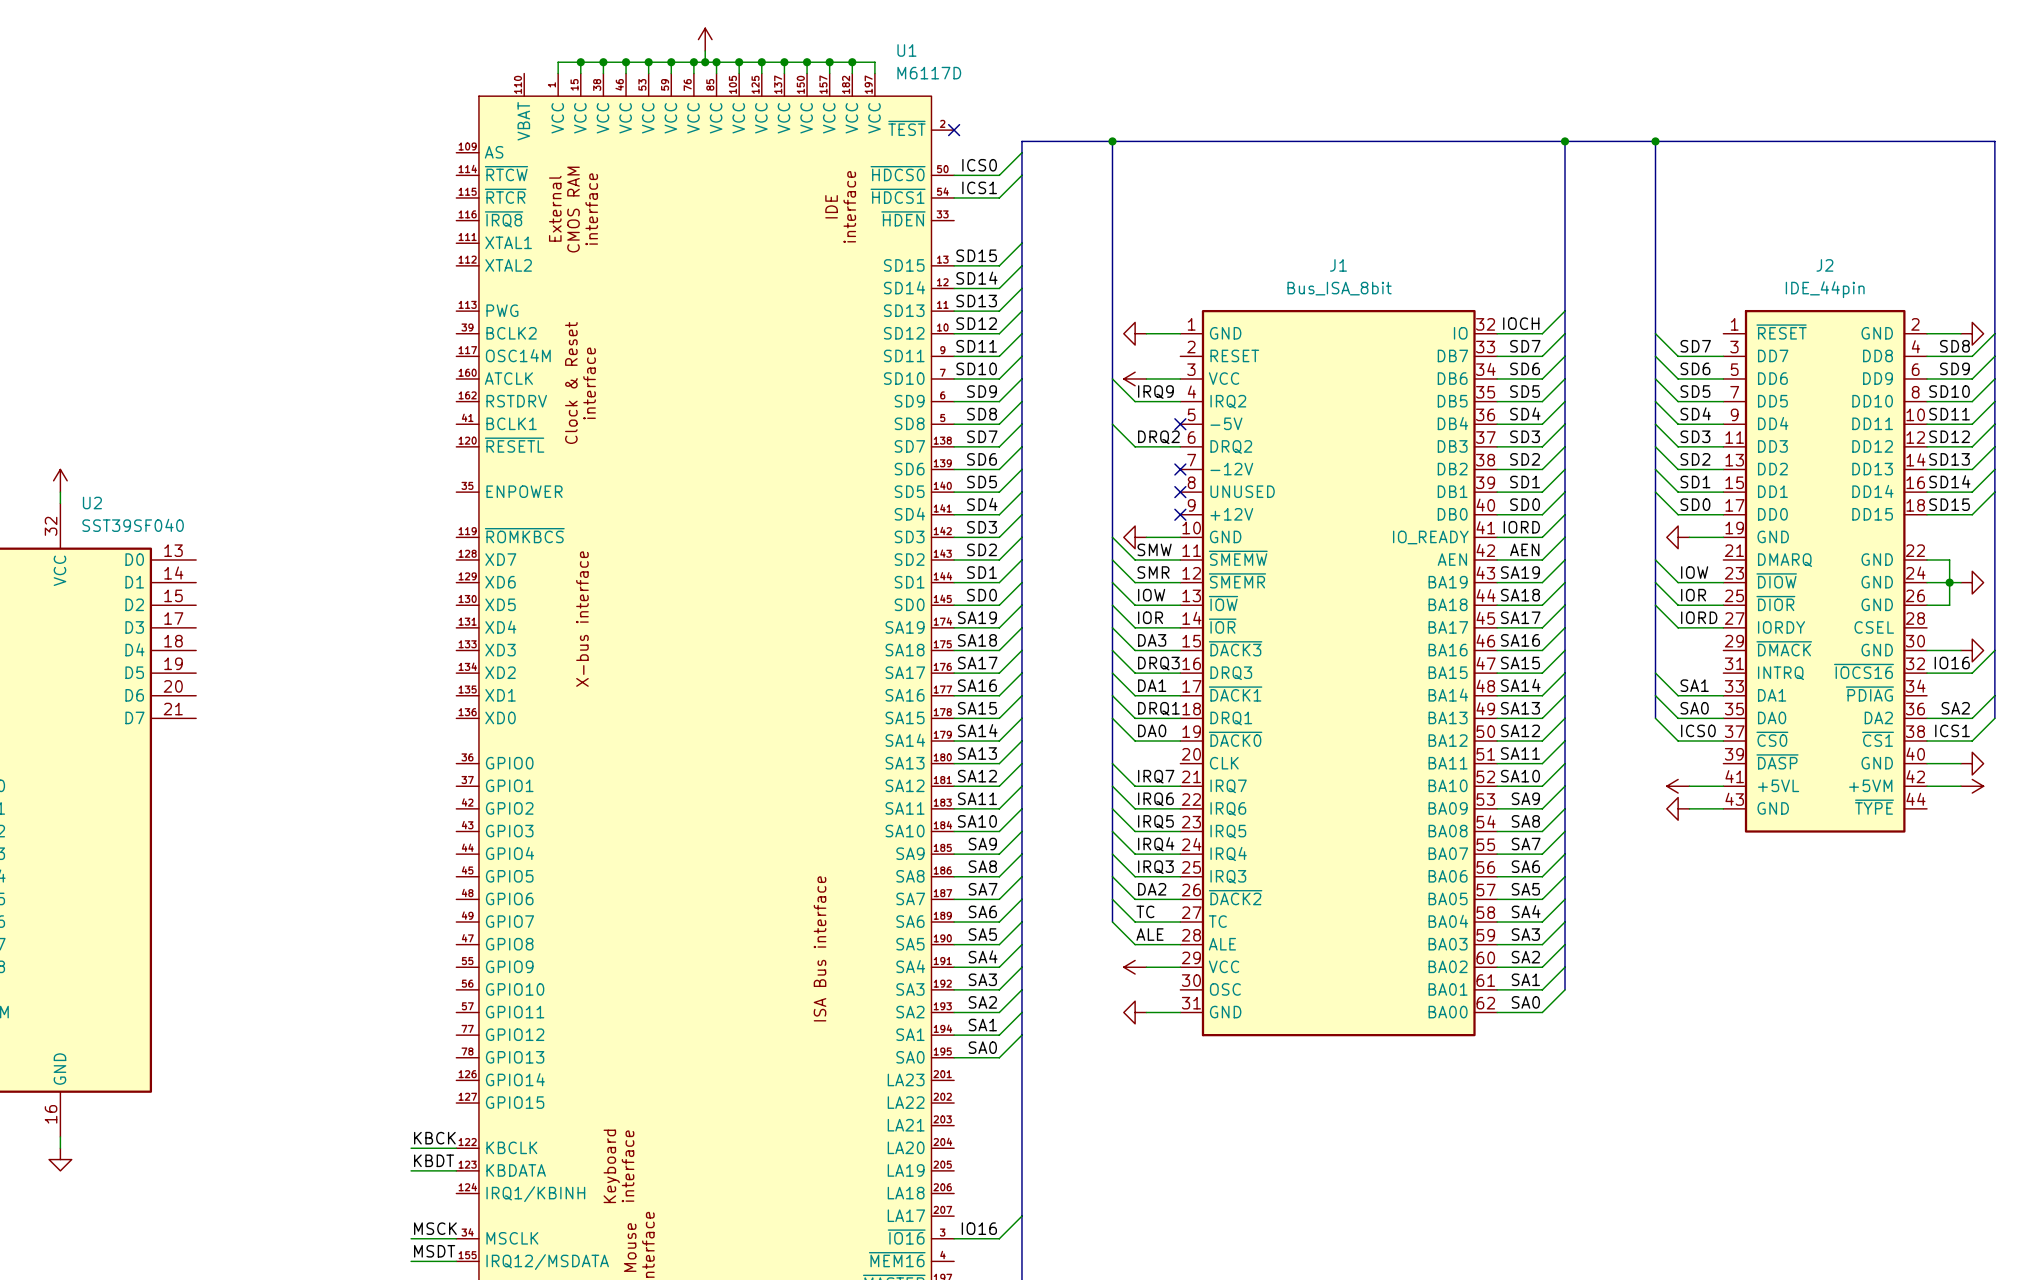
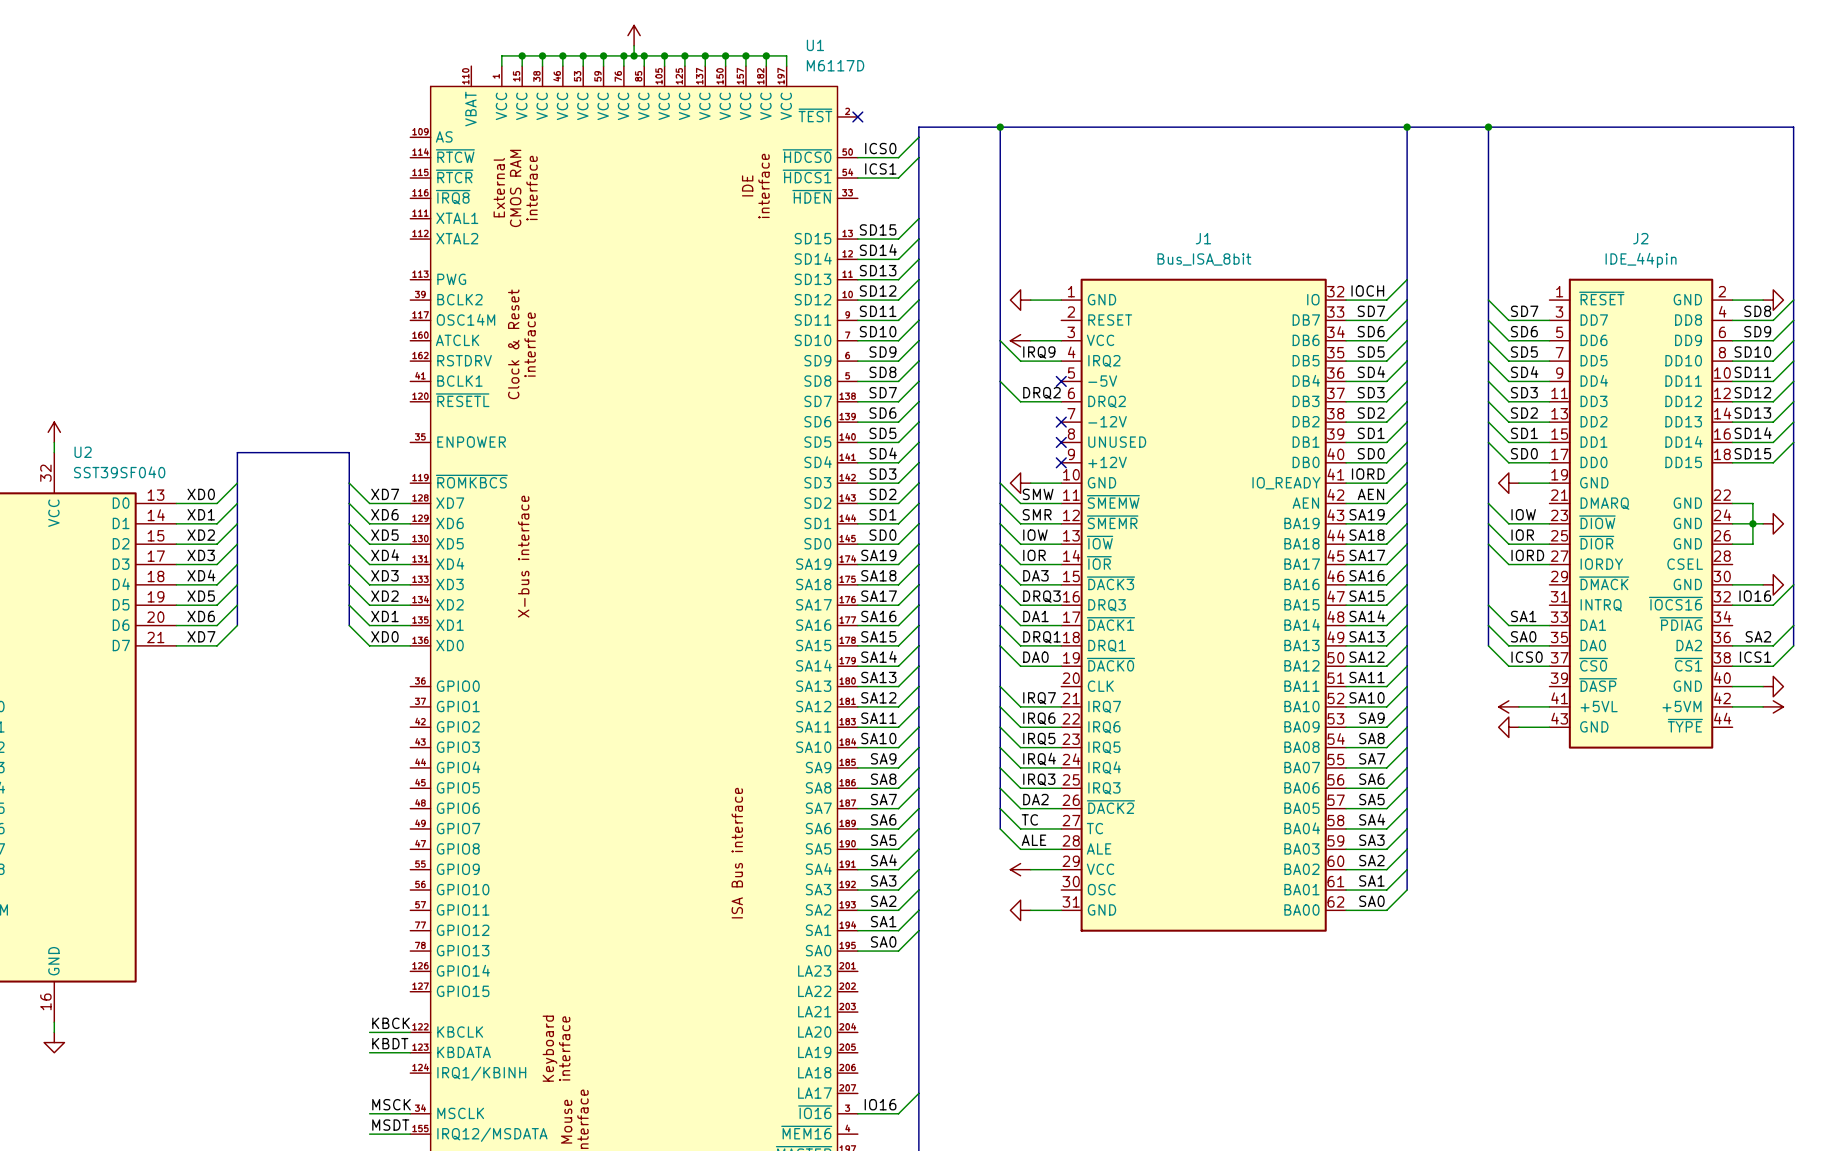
wire: none -> (237, 483) (217, 503) (176, 503)
wire: none -> (349, 483) (369, 503) (410, 503)
label: none -> XD0 (201, 494)
label: none -> XD7 (385, 494)
wire: none -> (237, 503) (217, 523) (176, 523)
wire: none -> (349, 503) (369, 523) (410, 523)
label: none -> XD1 (201, 514)
label: none -> XD6 (384, 514)
wire: none -> (237, 523) (217, 544) (176, 544)
wire: none -> (349, 523) (369, 544) (410, 544)
label: none -> XD2 (201, 535)
label: none -> XD5 (384, 535)
wire: none -> (237, 544) (217, 564) (176, 564)
wire: none -> (349, 544) (369, 564) (410, 564)
label: none -> XD3 (201, 555)
label: none -> XD4 (385, 555)
wire: none -> (237, 564) (217, 584) (176, 584)
wire: none -> (349, 564) (369, 584) (410, 584)
label: none -> XD4 (201, 575)
label: none -> XD3 (384, 575)
wire: none -> (237, 584) (217, 605) (176, 605)
wire: none -> (349, 584) (369, 605) (410, 605)
label: none -> XD5 (201, 596)
label: none -> XD2 (384, 596)
wire: none -> (237, 605) (217, 625) (176, 625)
wire: none -> (349, 605) (369, 625) (410, 625)
label: none -> XD6 (201, 616)
label: none -> XD1 (384, 616)
wire: none -> (237, 625) (217, 645) (176, 645)
bus: none -> (237, 625) (237, 452) (349, 452) (349, 625)
wire: none -> (349, 625) (369, 645) (410, 645)
label: none -> XD7 (201, 636)
label: none -> XD0 (384, 636)

